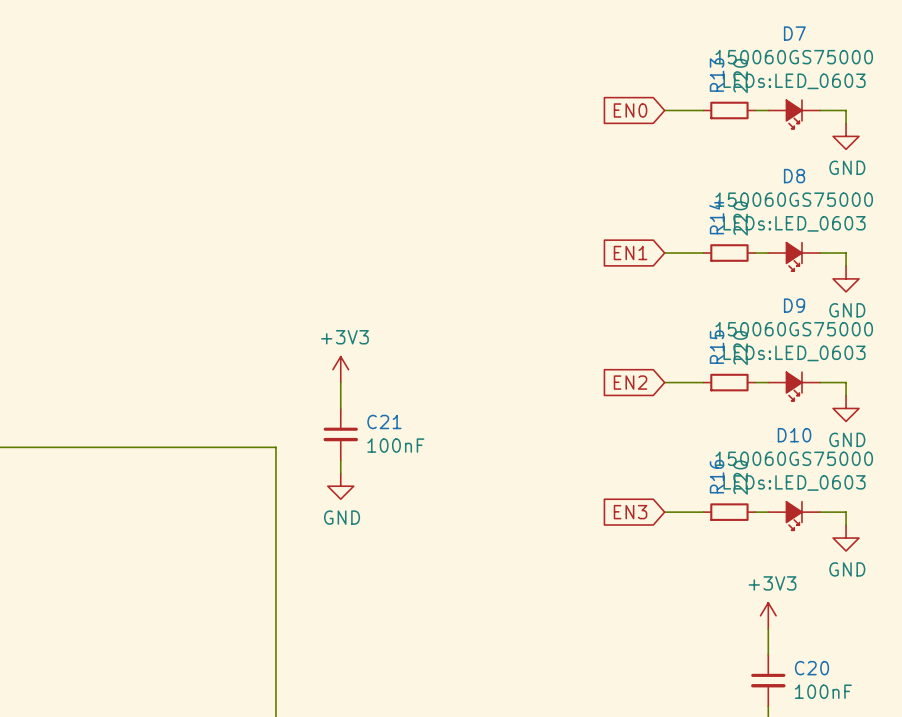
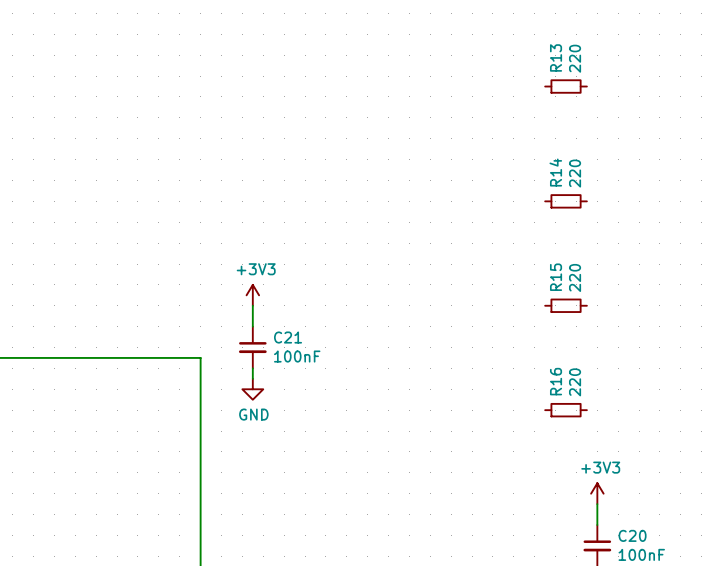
global label: EN0 (630, 110) -> none
wire: (664, 110) (703, 110) -> none
wire: (755, 110) (768, 110) -> none
wire: (820, 110) (846, 110) (846, 123) -> none
D7: 150060GS75000 (794, 114) -> none
power symbol: GND (846, 136) -> none
global label: EN1 (630, 253) -> none
wire: (664, 253) (703, 253) -> none
wire: (755, 253) (768, 253) -> none
wire: (820, 253) (846, 253) (846, 265) -> none
D8: 150060GS75000 (794, 256) -> none
power symbol: GND (846, 278) -> none
global label: EN2 (630, 382) -> none
wire: (664, 382) (703, 382) -> none
wire: (755, 382) (768, 382) -> none
wire: (820, 382) (846, 382) (846, 395) -> none
D9: 150060GS75000 (794, 386) -> none
power symbol: GND (846, 408) -> none
global label: EN3 (630, 512) -> none
wire: (664, 512) (703, 512) -> none
wire: (755, 512) (768, 512) -> none
wire: (820, 512) (846, 512) (846, 525) -> none
D10: 150060GS75000 (794, 516) -> none
power symbol: GND (846, 538) -> none

